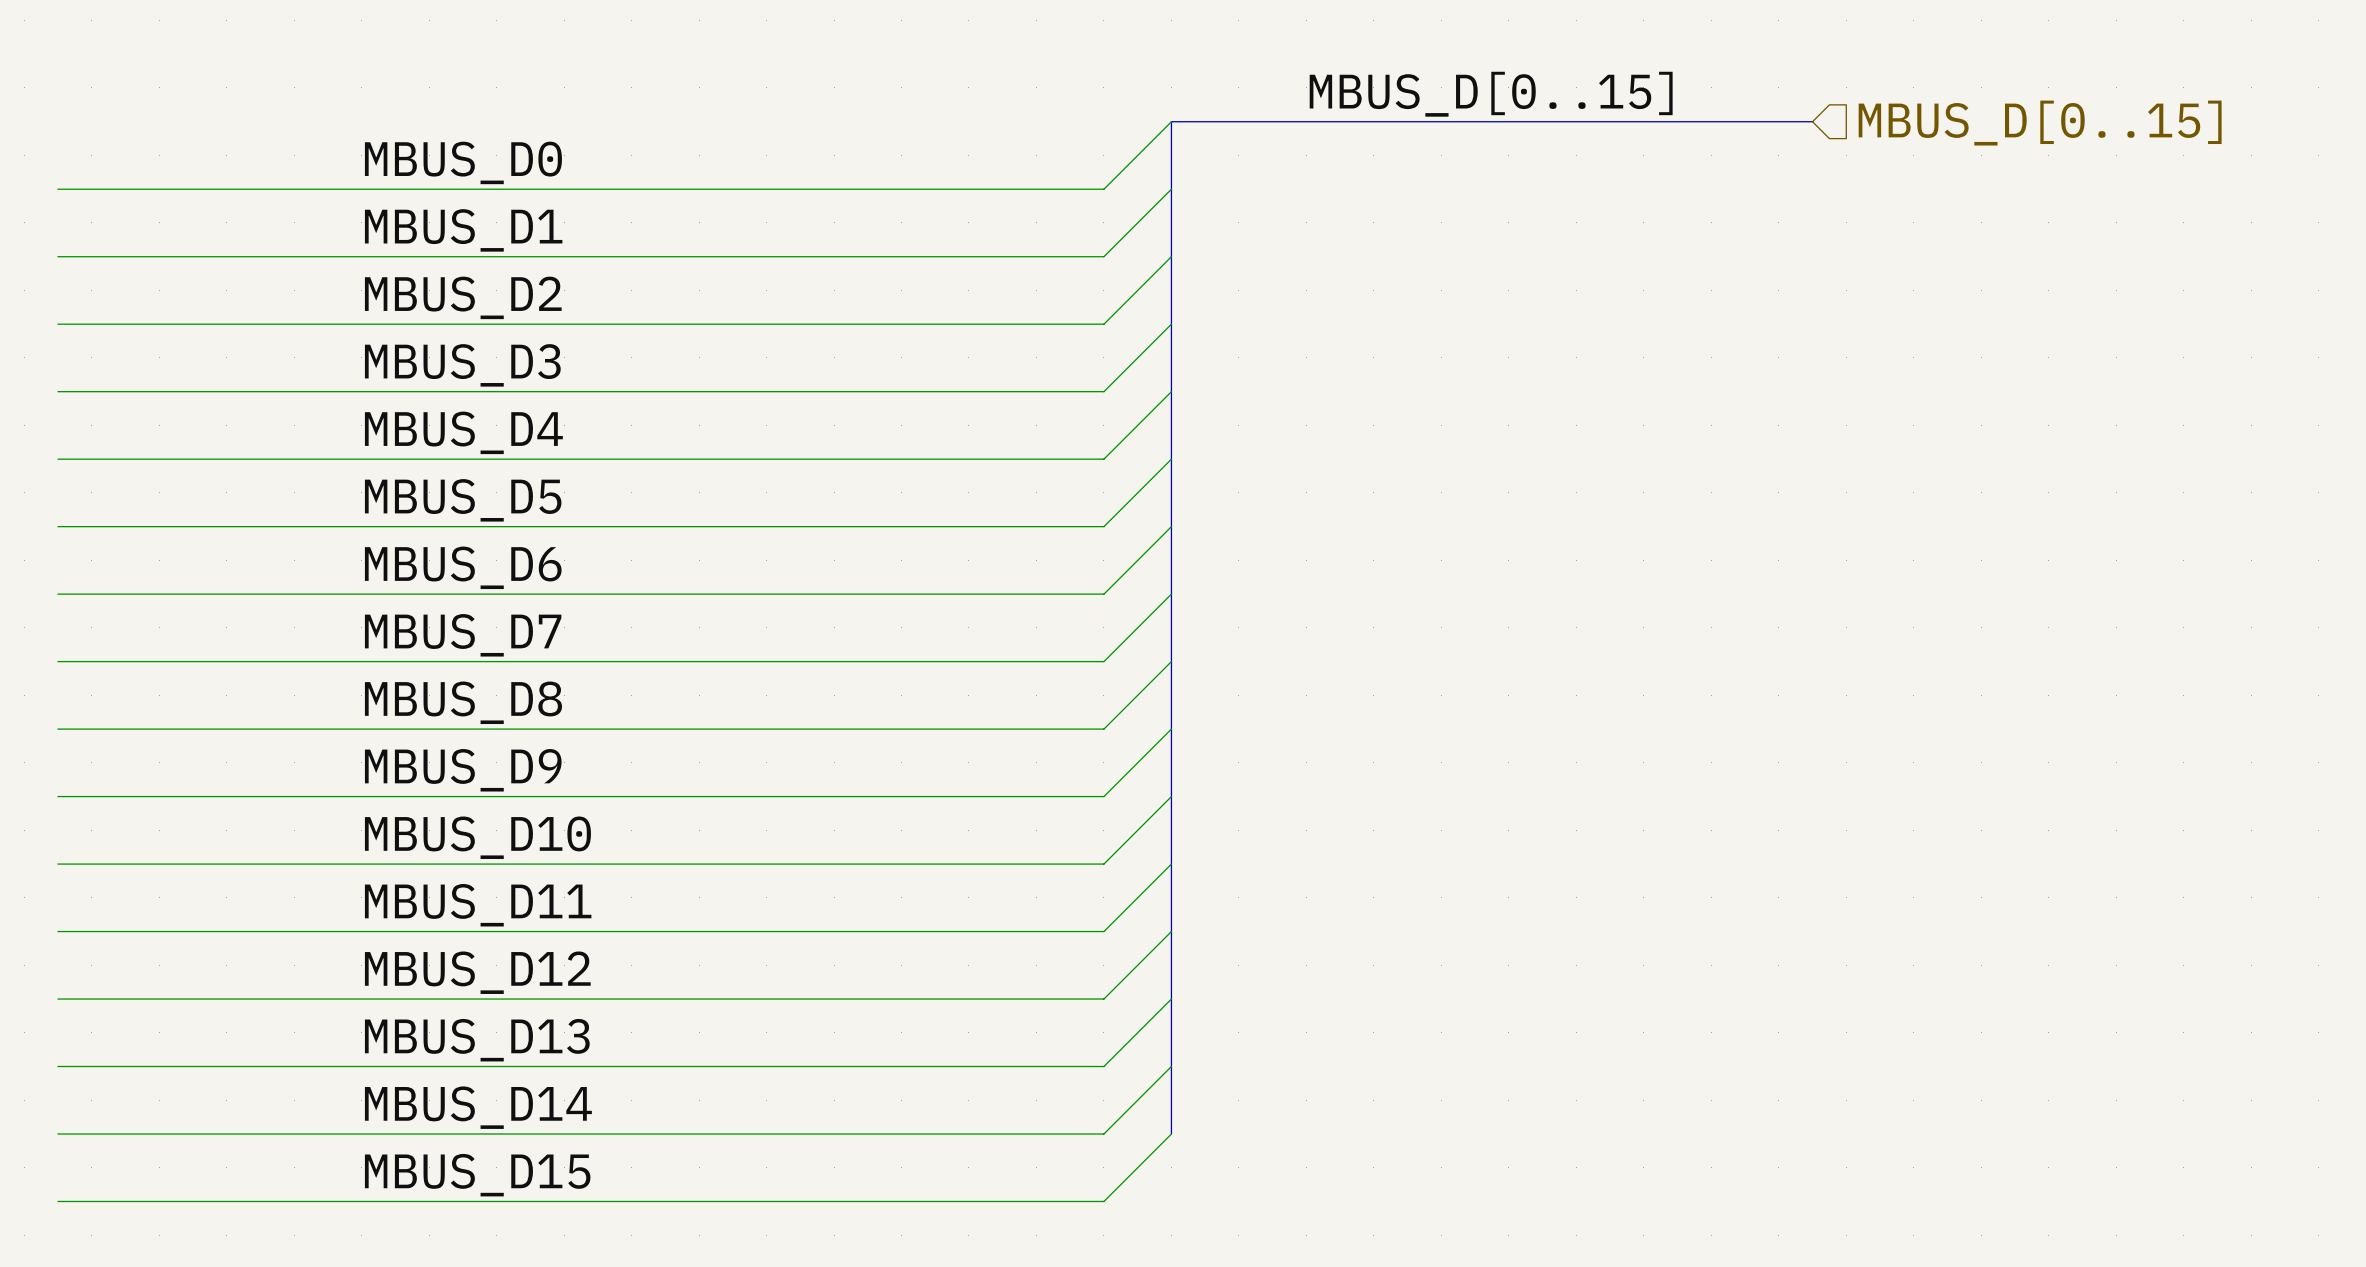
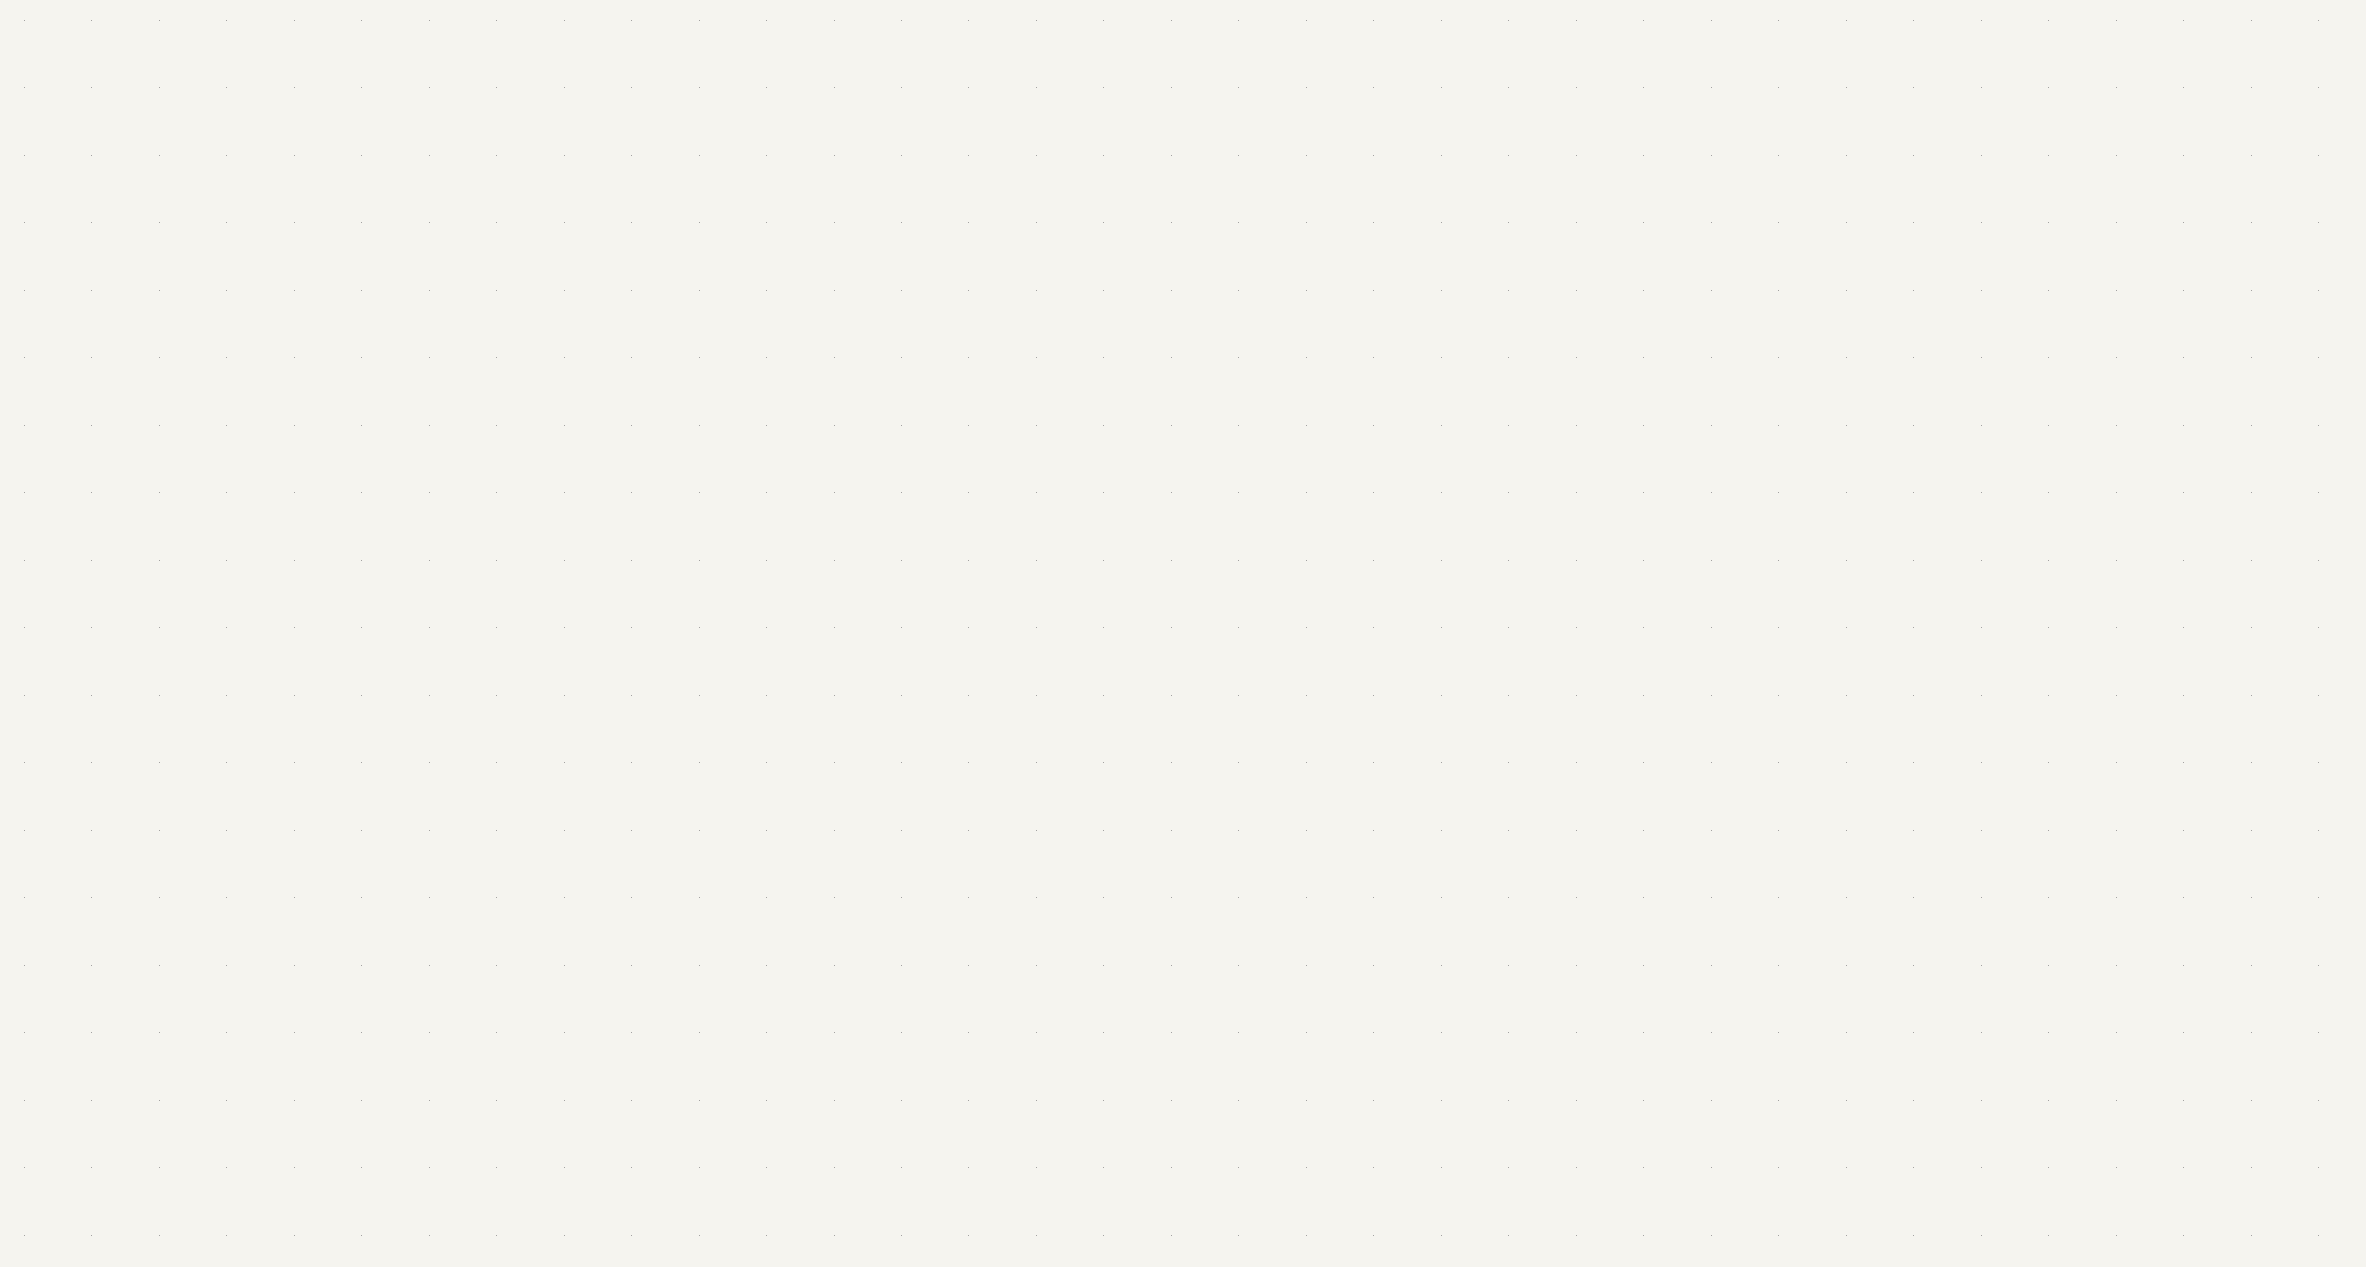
label: MBUS_D[0..15] (1491, 94) -> none
wire: (1171, 121) (1103, 189) (57, 189) -> none
bus: (1812, 121) (1171, 121) (1171, 1133) -> none
hierarchical label: MBUS_D[0..15] (2040, 123) -> none
label: MBUS_D0 (463, 162) -> none
wire: (1171, 189) (1103, 256) (57, 256) -> none
label: MBUS_D1 (463, 230) -> none
wire: (1171, 256) (1103, 324) (57, 324) -> none
label: MBUS_D2 (463, 297) -> none
wire: (1171, 324) (1103, 391) (57, 391) -> none
label: MBUS_D3 (462, 365) -> none
wire: (1171, 391) (1103, 459) (57, 459) -> none
label: MBUS_D4 (463, 432) -> none
wire: (1171, 459) (1103, 526) (57, 526) -> none
label: MBUS_D5 (463, 500) -> none
wire: (1171, 526) (1103, 594) (57, 594) -> none
label: MBUS_D6 (463, 567) -> none
wire: (1171, 594) (1103, 661) (57, 661) -> none
label: MBUS_D7 (463, 635) -> none
wire: (1171, 661) (1103, 729) (57, 729) -> none
label: MBUS_D8 (463, 702) -> none
wire: (1171, 729) (1103, 796) (57, 796) -> none
label: MBUS_D9 (463, 770) -> none
wire: (1171, 796) (1103, 864) (57, 864) -> none
label: MBUS_D10 (477, 837) -> none
wire: (1171, 864) (1103, 931) (57, 931) -> none
label: MBUS_D11 (478, 905) -> none
wire: (1171, 931) (1103, 999) (57, 999) -> none
label: MBUS_D12 (477, 972) -> none
wire: (1171, 999) (1103, 1066) (57, 1066) -> none
label: MBUS_D13 (477, 1040) -> none
wire: (1171, 1066) (1103, 1133) (57, 1133) -> none
label: MBUS_D14 (478, 1107) -> none
wire: (1171, 1133) (1103, 1201) (57, 1201) -> none
label: MBUS_D15 (477, 1175) -> none

